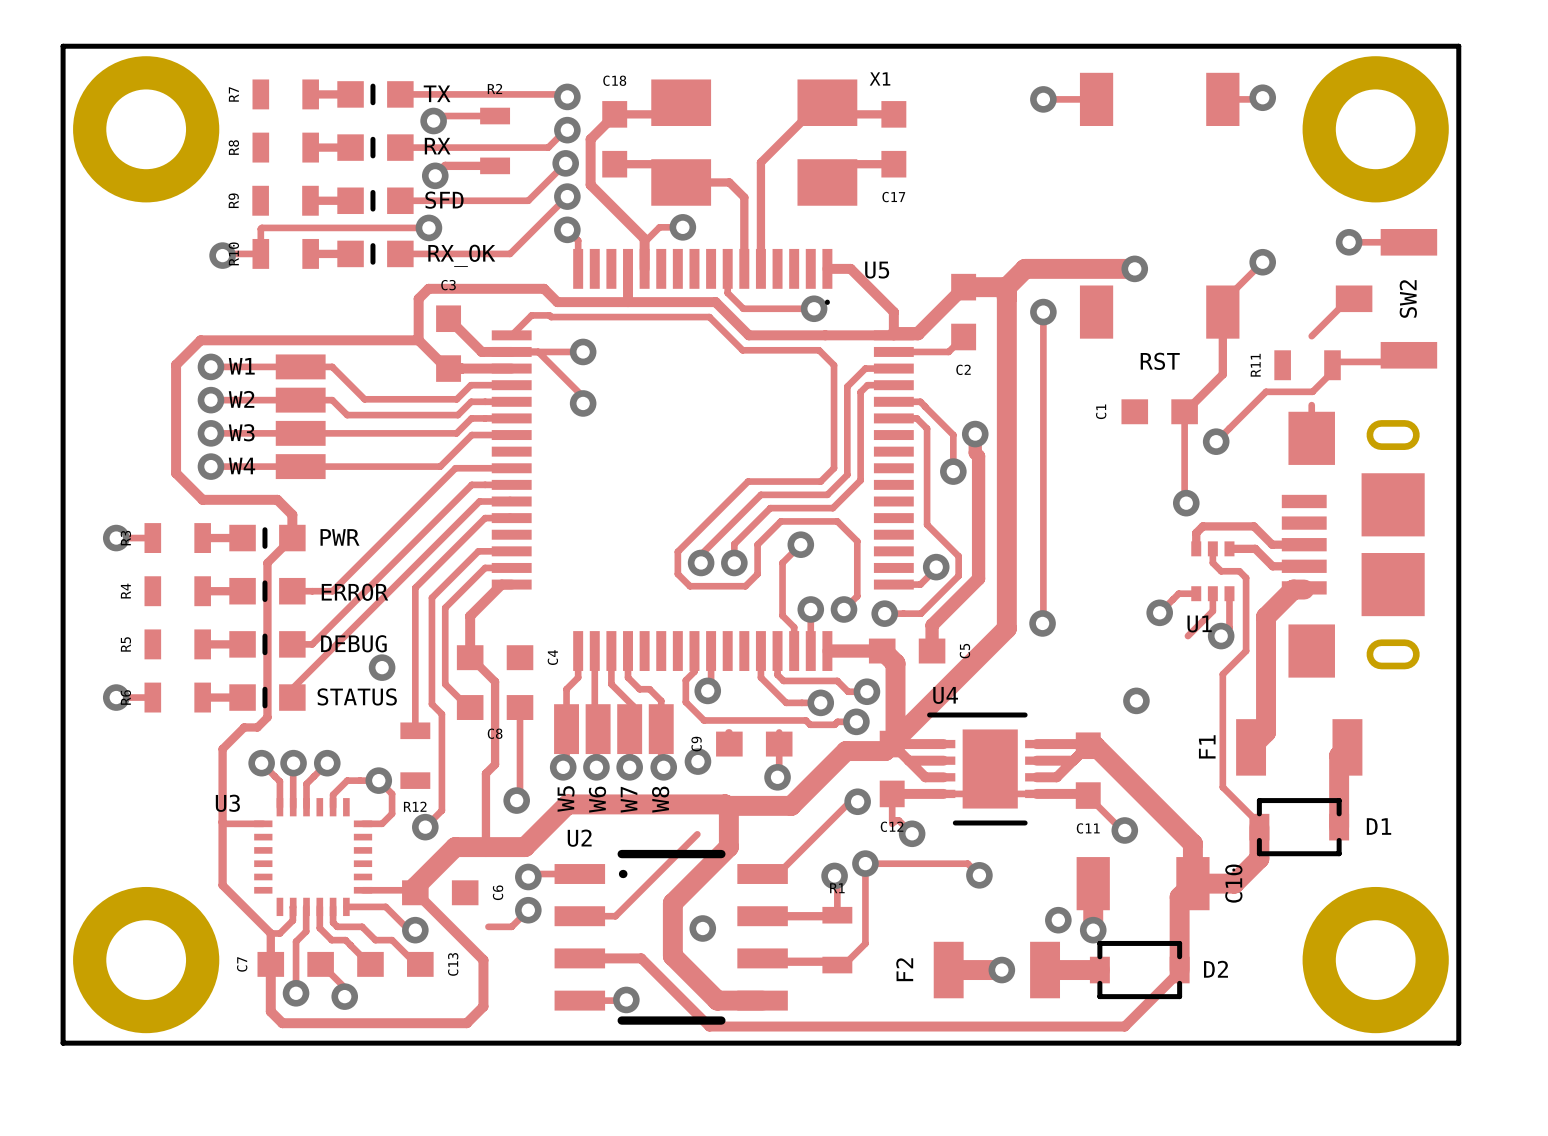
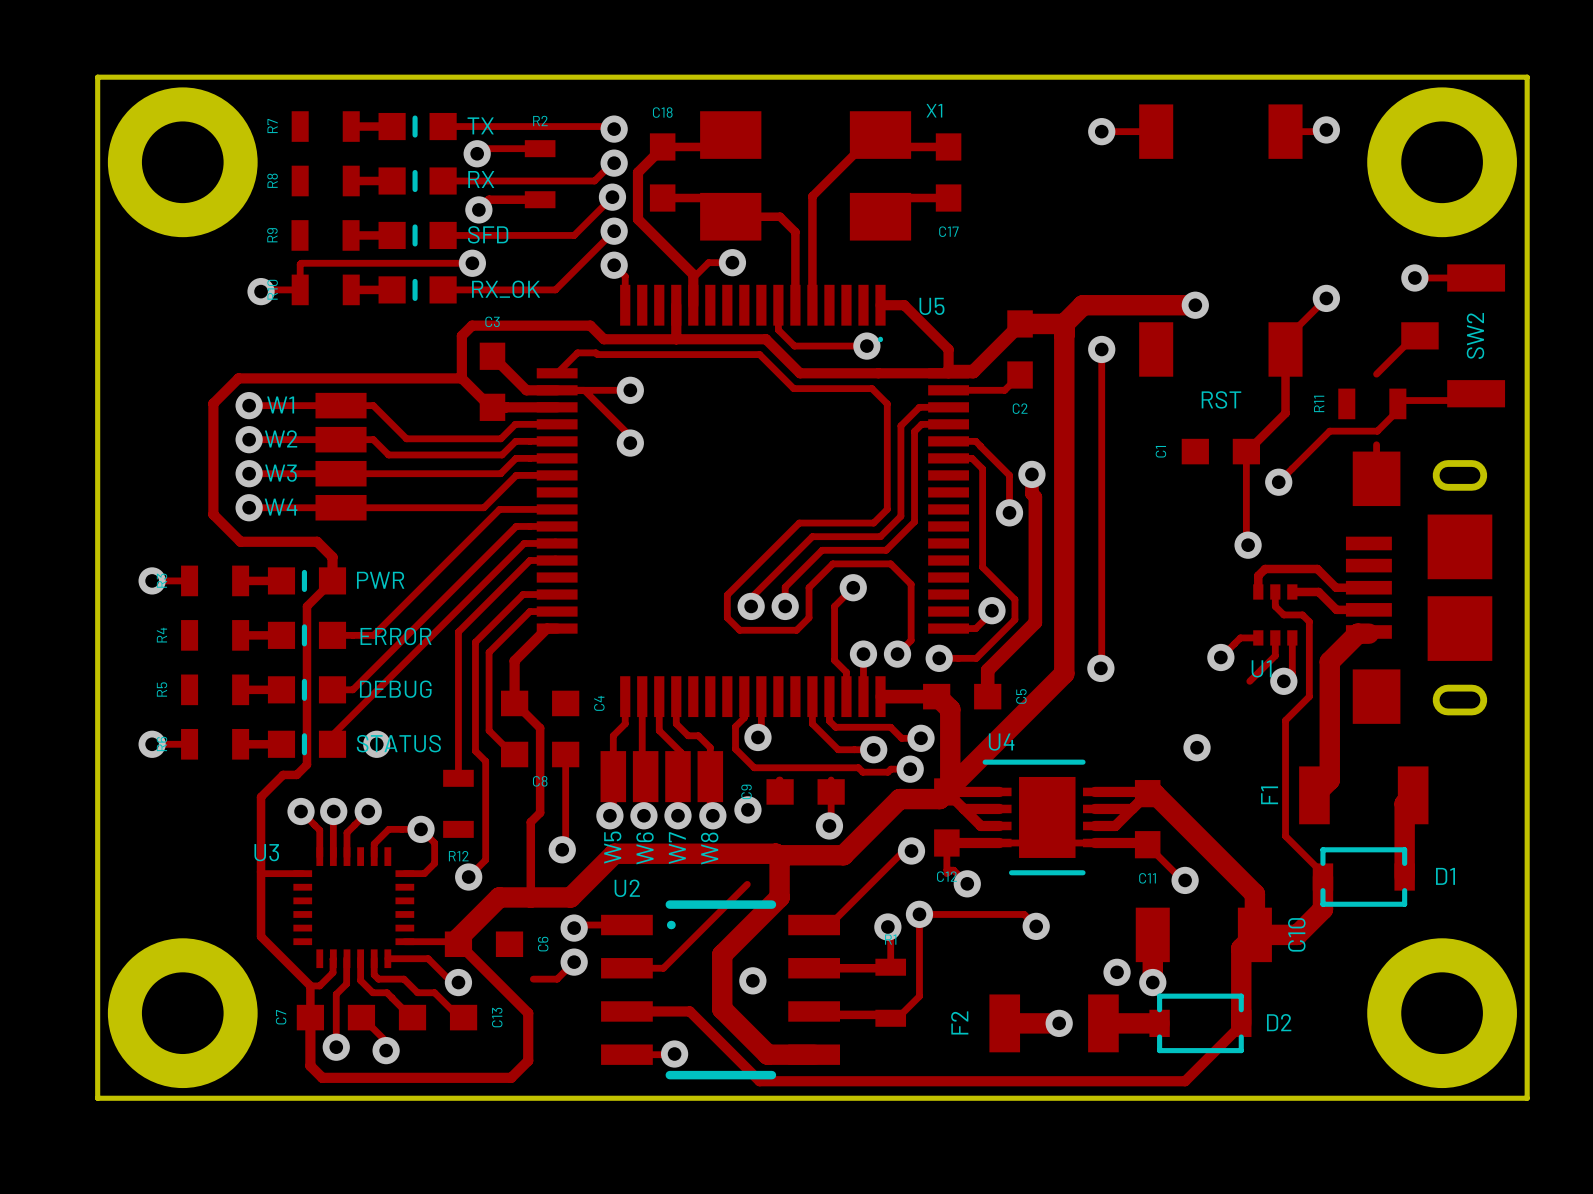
via position: (382, 667) -> (376, 744)

